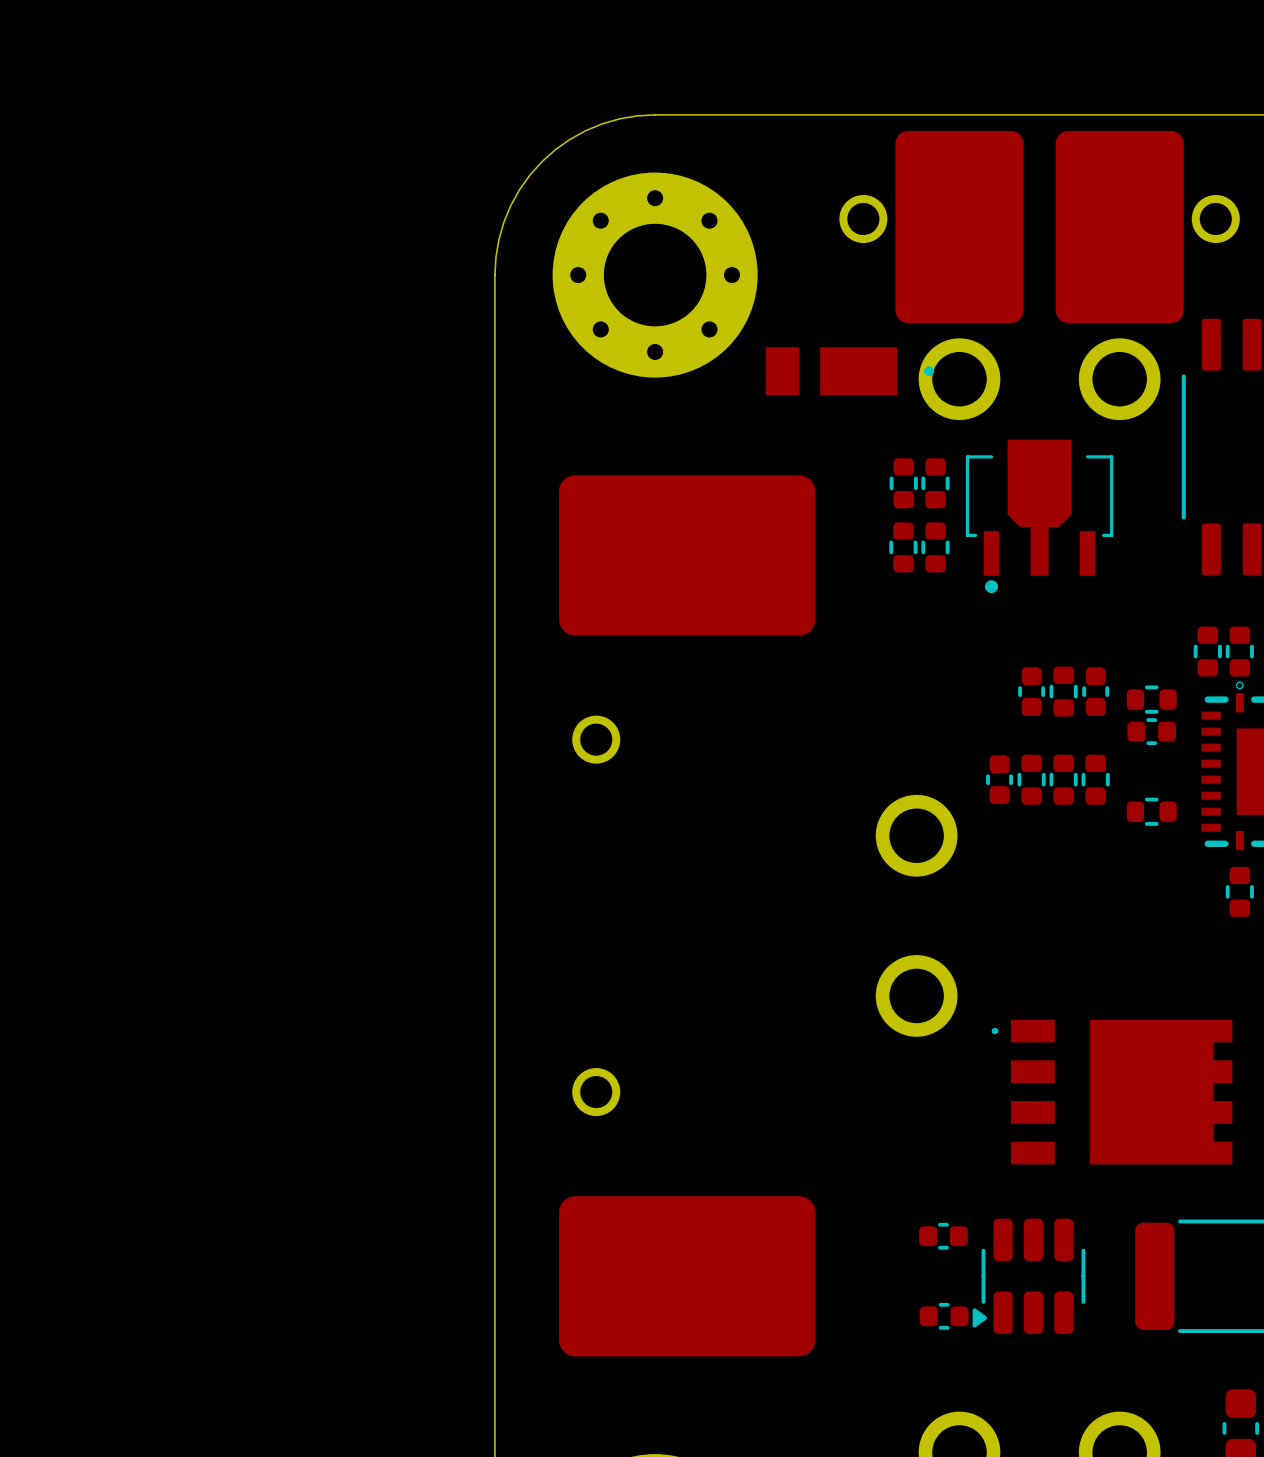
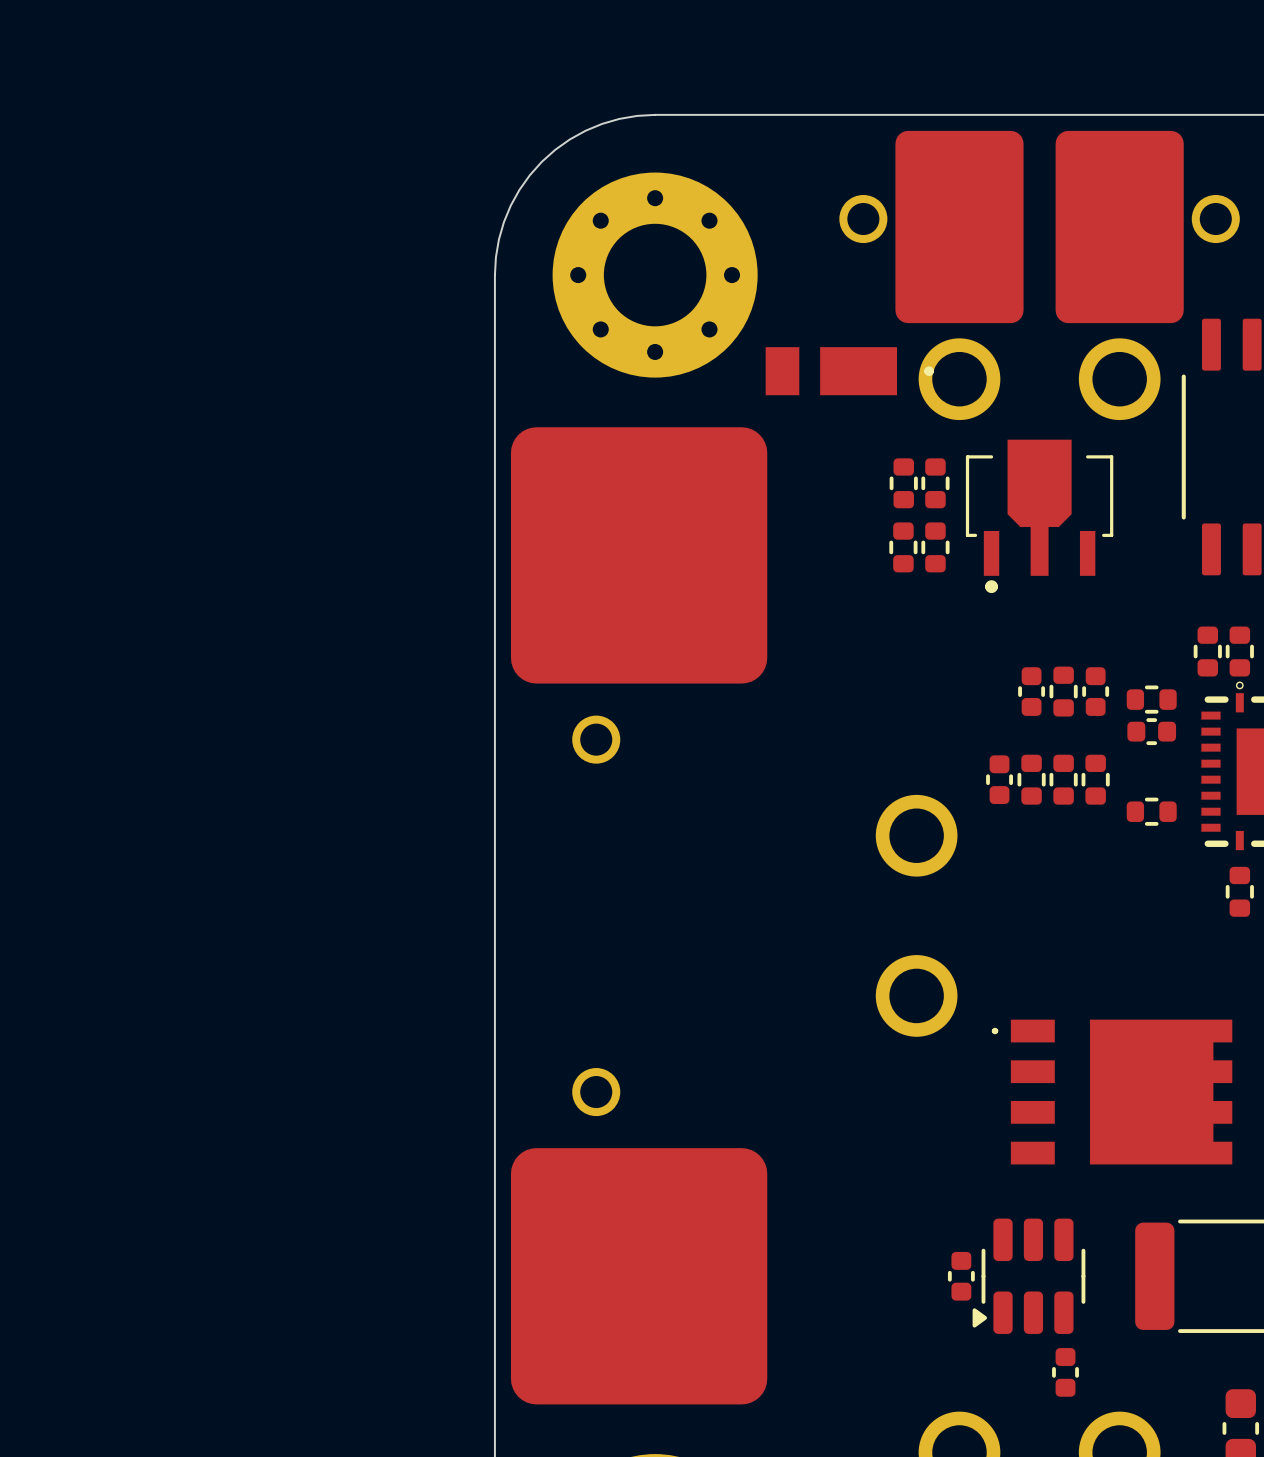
part: none -> (639, 555)
part: (687, 555) -> none
part: (943, 1236) -> none
part: none -> (639, 1276)
part: (687, 1276) -> none
part: none -> (961, 1276)
part: (944, 1316) -> none
part: none -> (1065, 1372)

